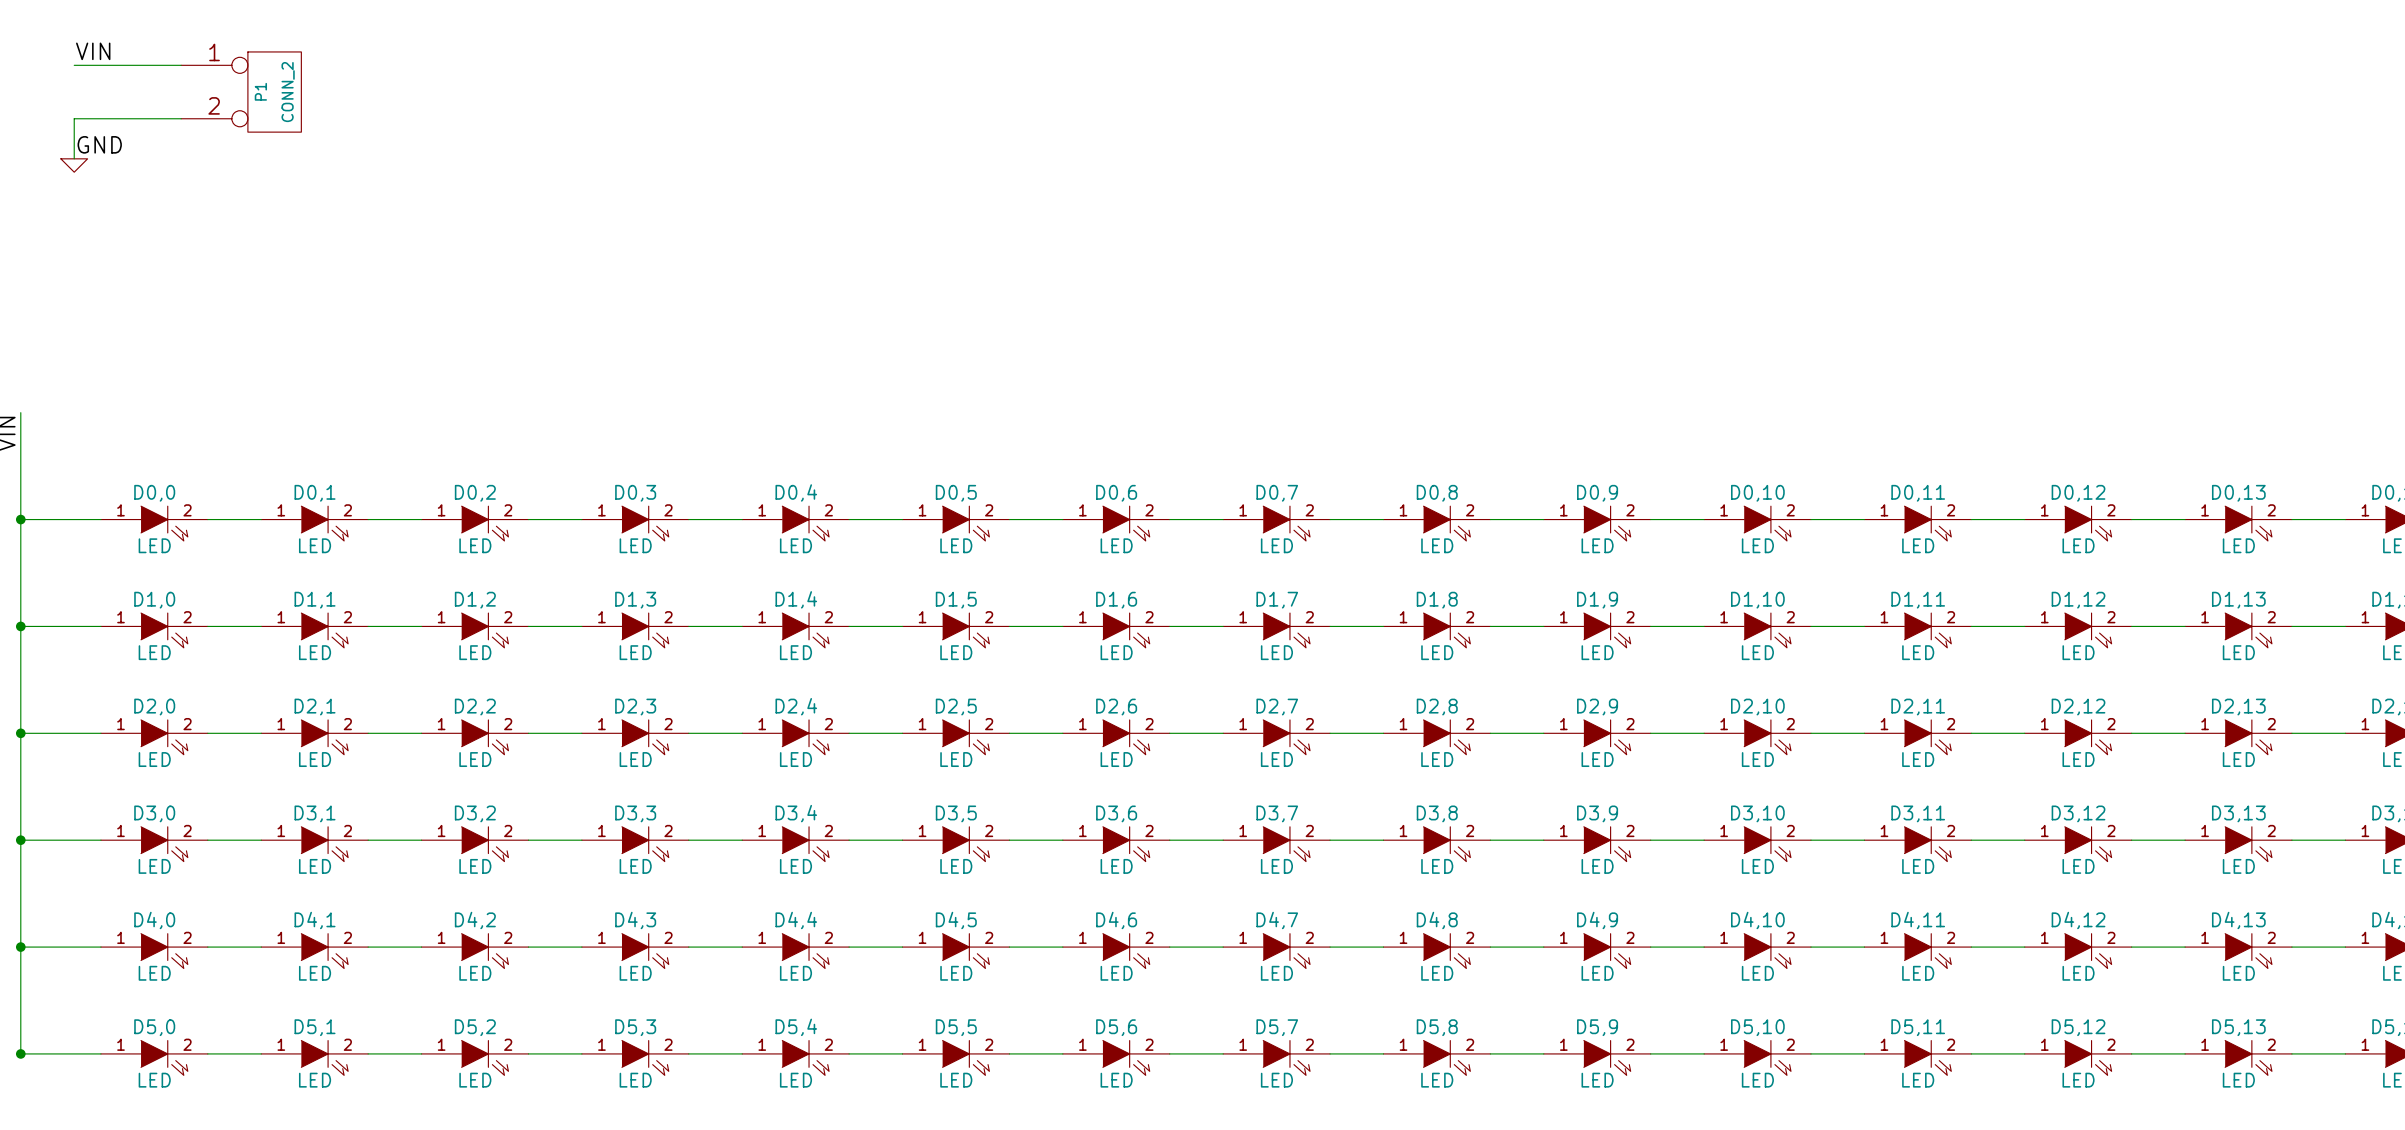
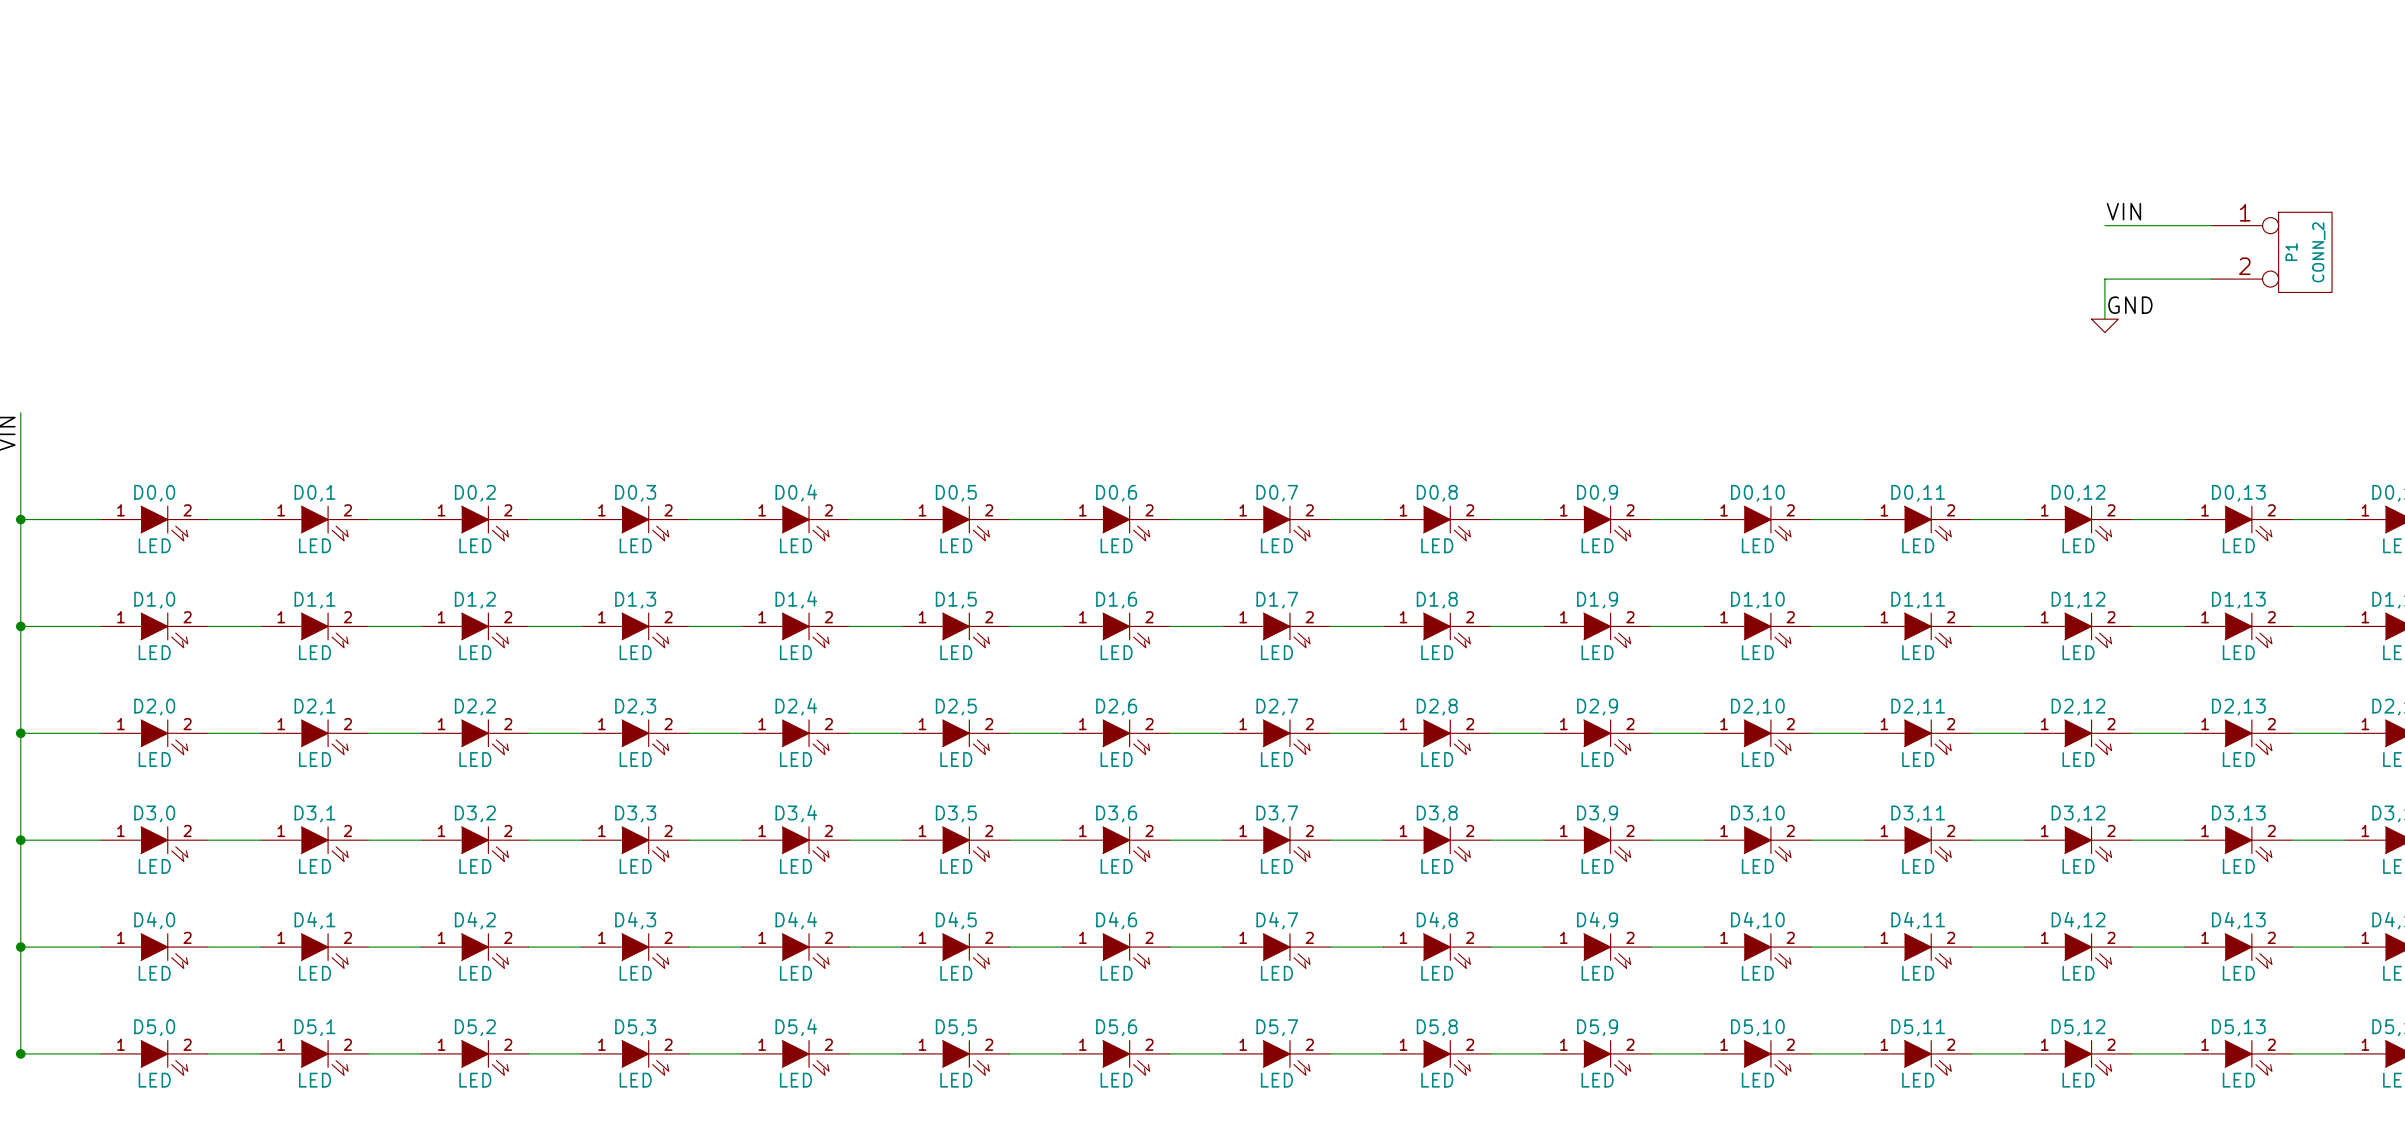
label: VIN (93, 51) -> none
wire: (74, 65) (181, 65) -> none
P1 position: (241, 92) -> (2271, 252)
wire: (181, 118) (74, 118) (74, 158) -> none
label: GND (99, 144) -> none
power symbol: (74, 165) -> none
label: none -> VIN (2123, 211)
wire: none -> (2104, 225) (2211, 225)
wire: none -> (2211, 279) (2104, 279) (2104, 319)
label: none -> GND (2130, 305)
power symbol: none -> (2104, 325)

